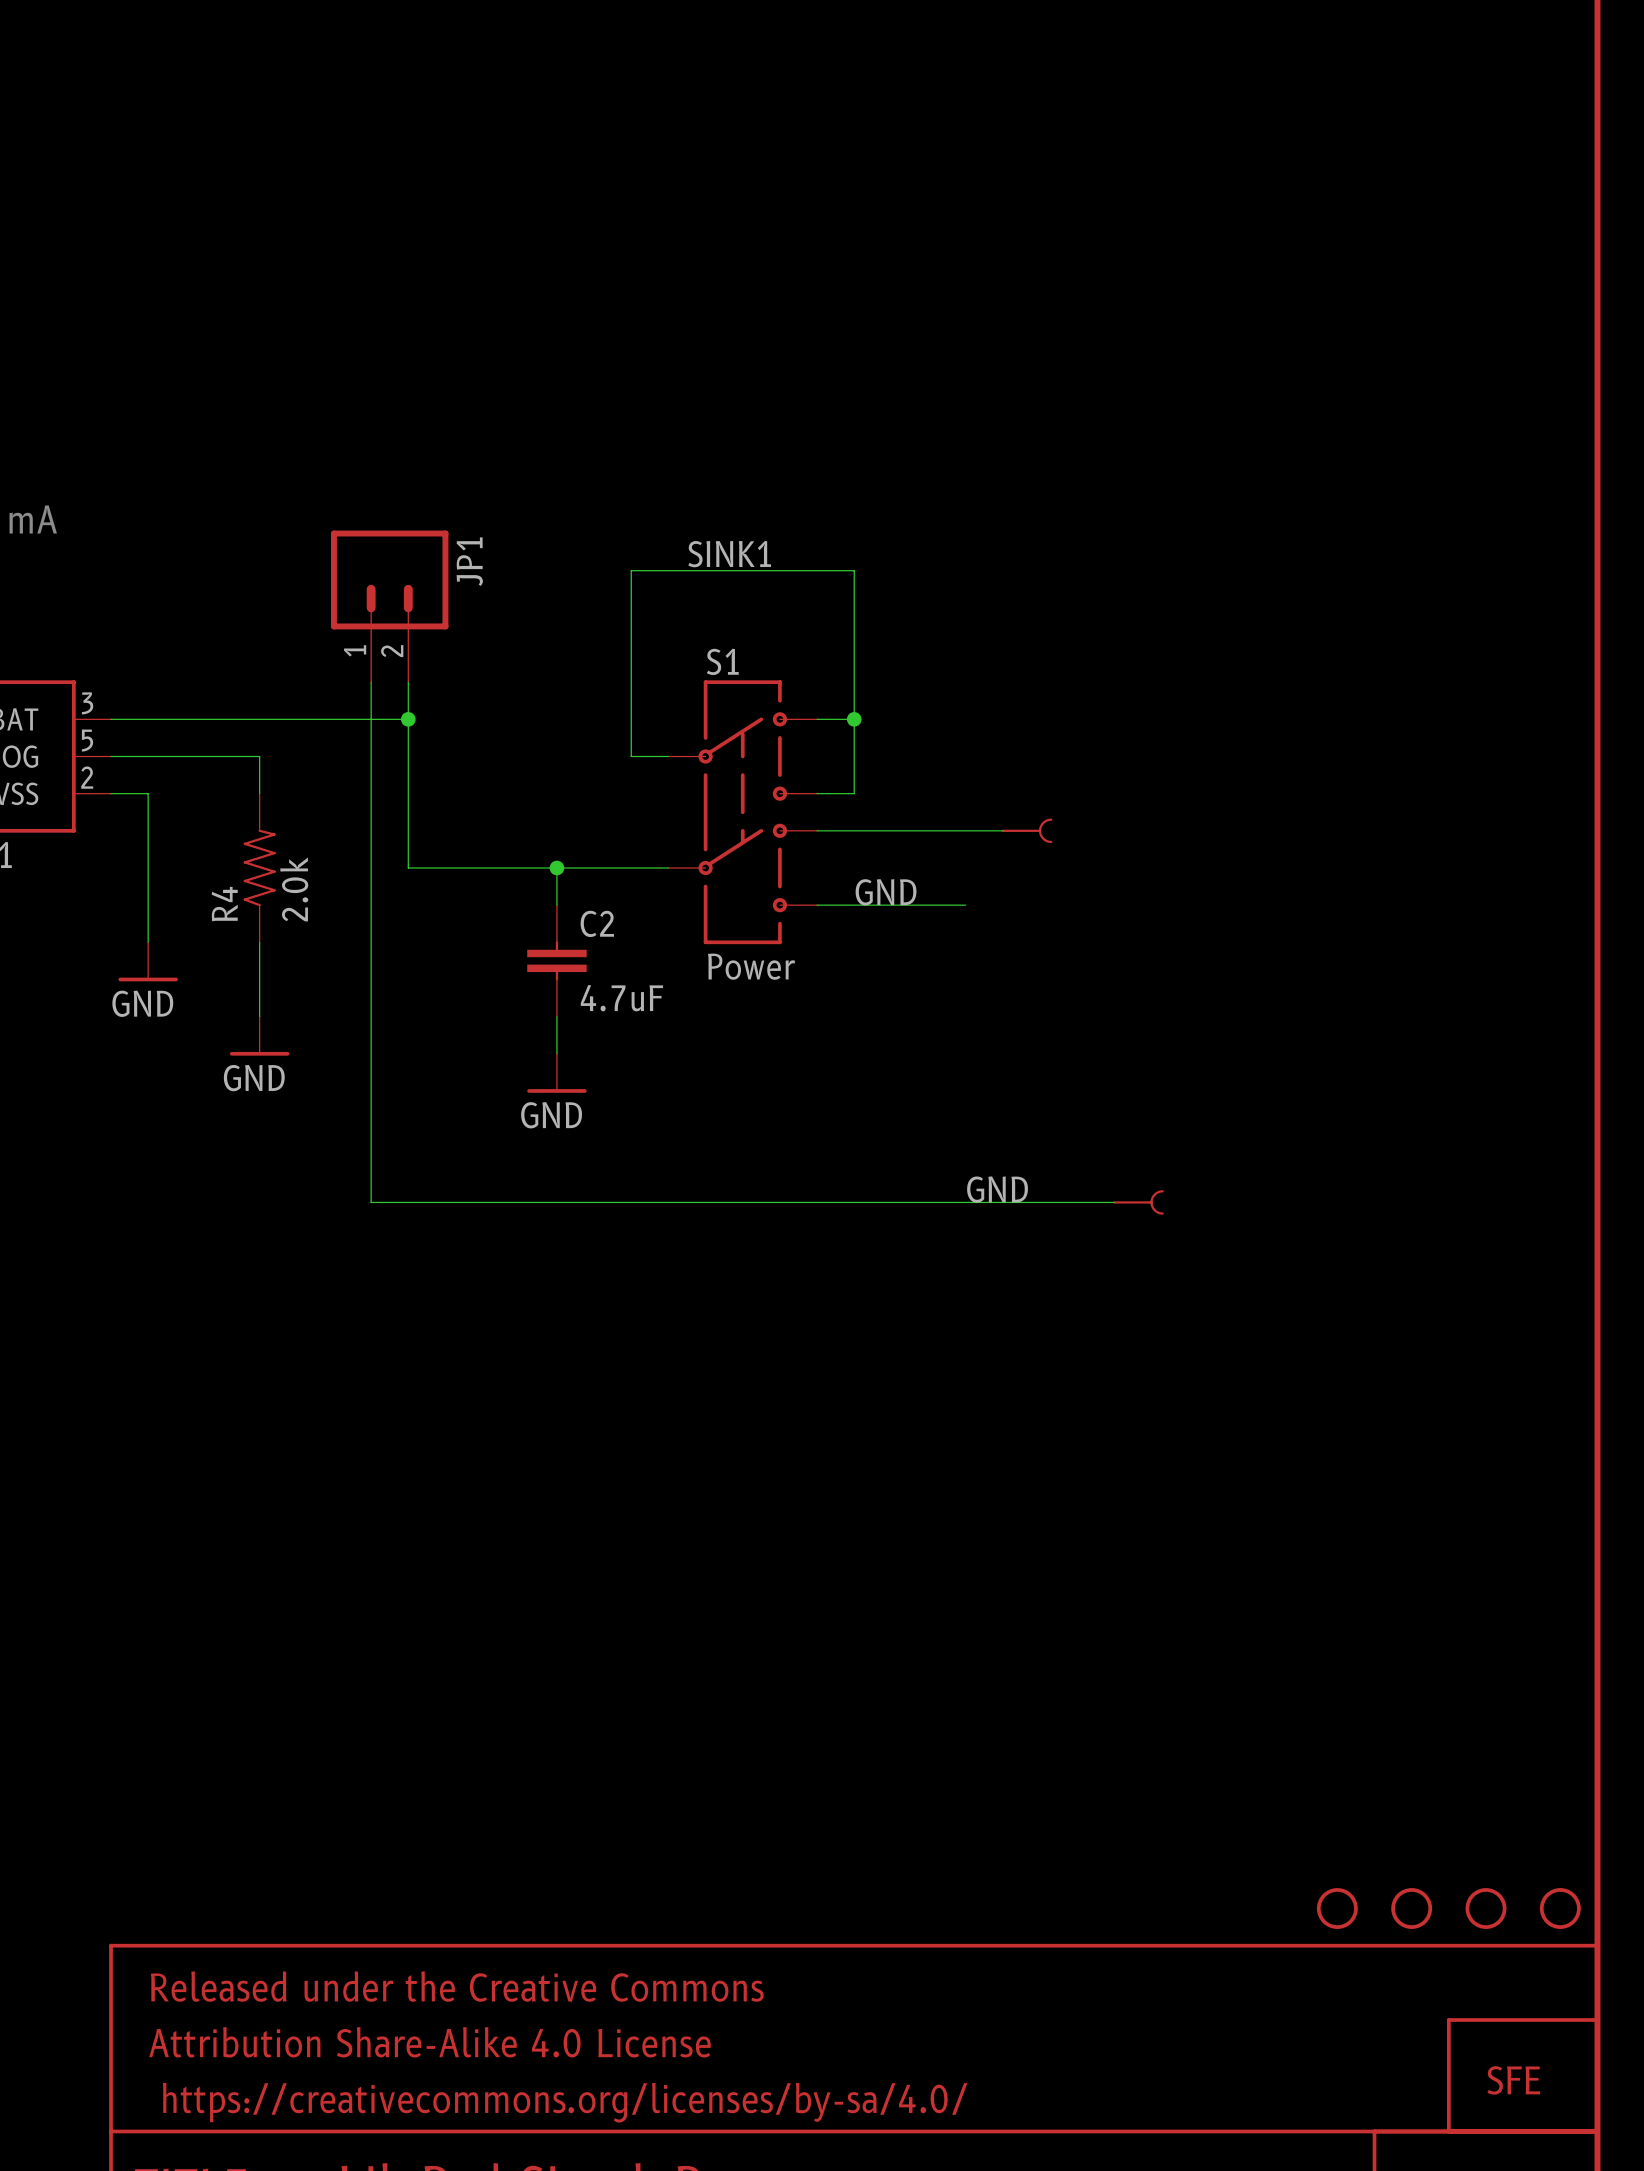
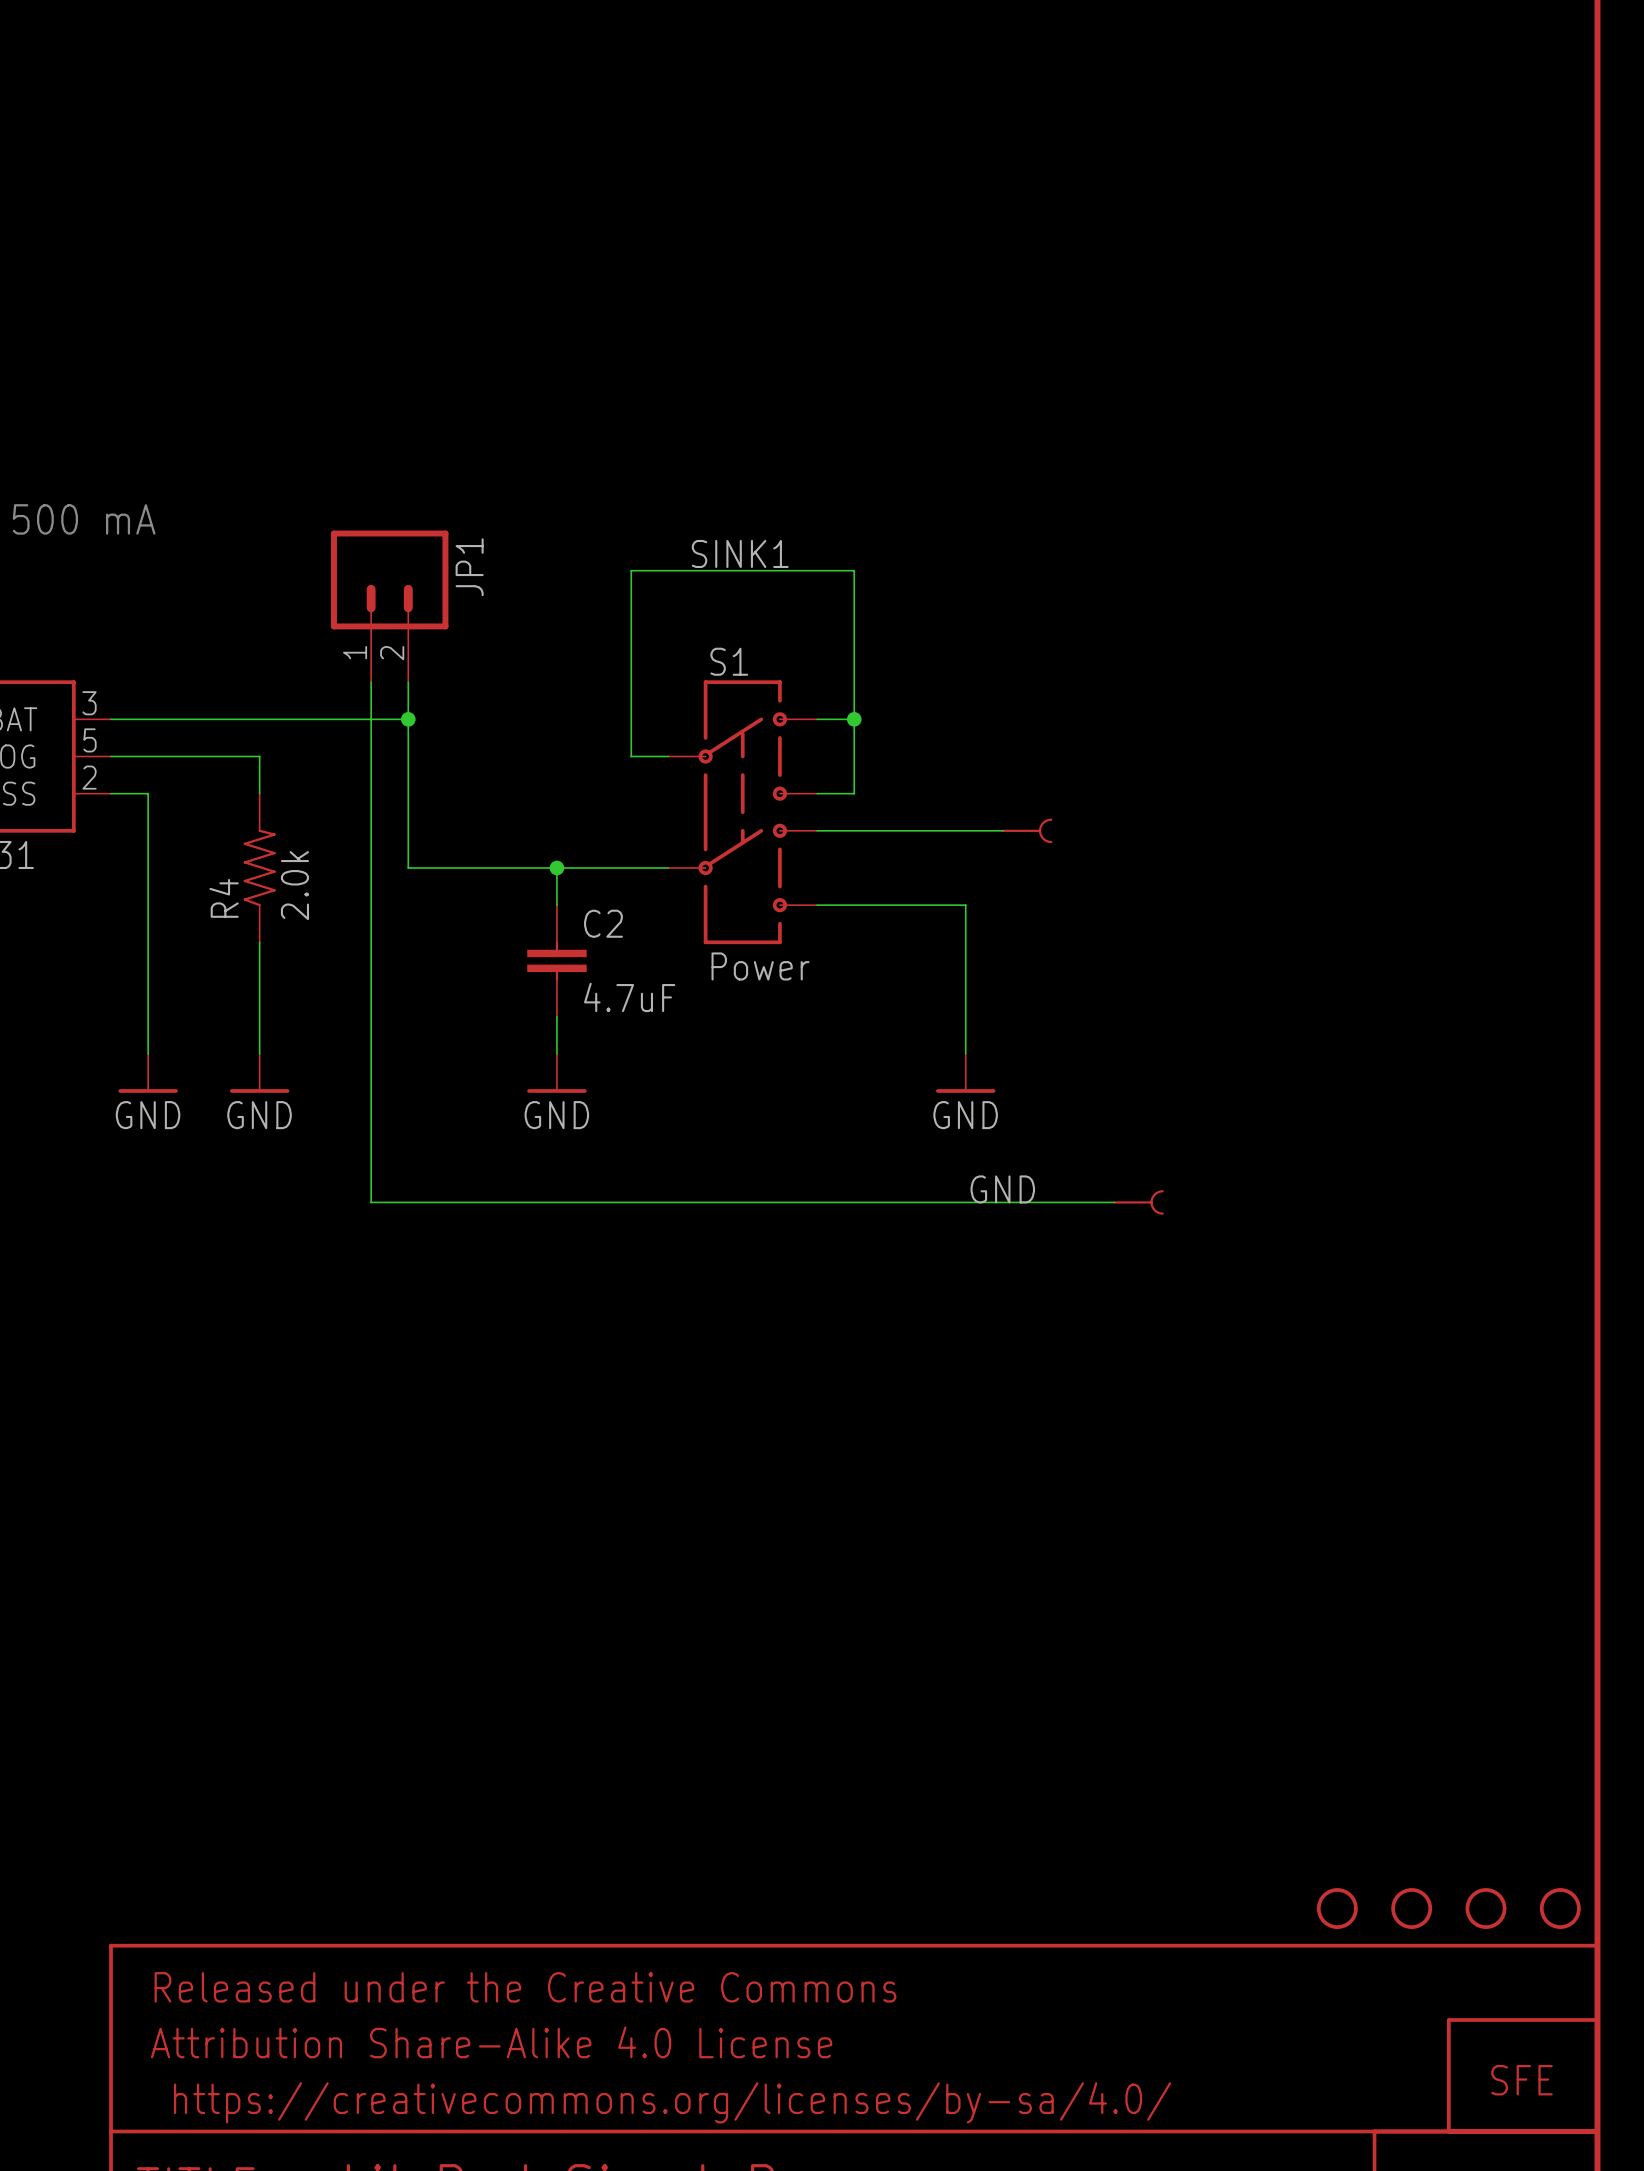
label: GND (886, 892) -> none
wire: none -> (965, 905) (965, 1053)
wire: none -> (148, 942) (148, 1053)
power symbol: GND (148, 961) -> none
power symbol position: GND (259, 1036) -> GND (259, 1073)
power symbol: none -> GND (148, 1073)
power symbol: none -> GND (965, 1073)

